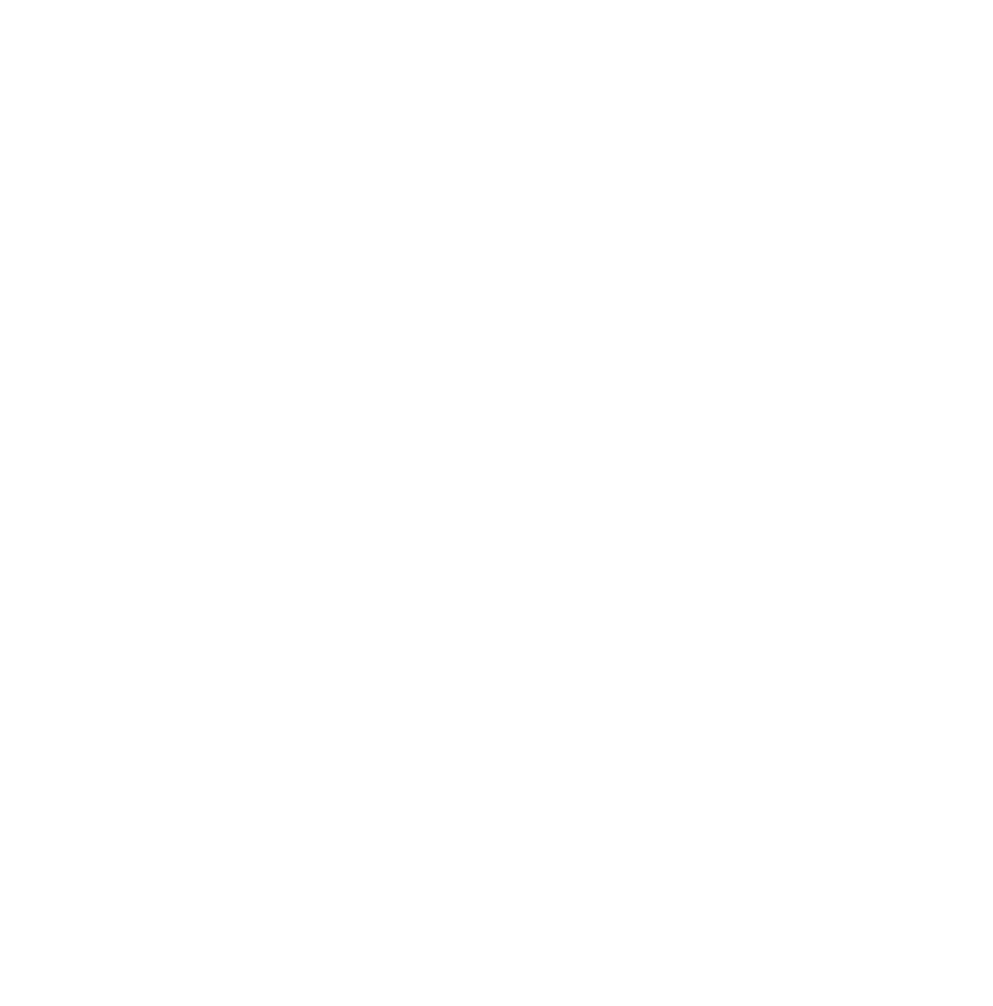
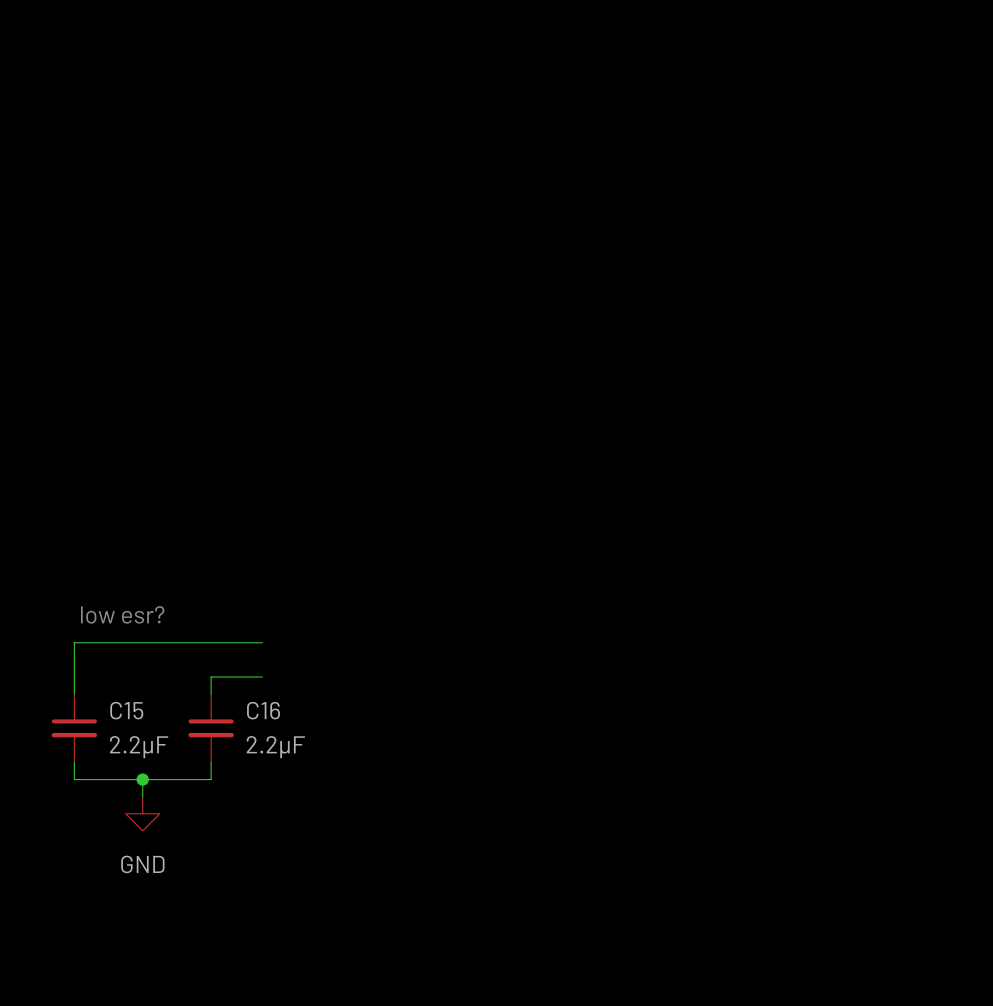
text: none -> low esr? (122, 614)
wire: none -> (262, 642) (74, 642) (74, 694)
wire: none -> (262, 677) (211, 677) (211, 694)
C15: none -> 2.2μF (74, 728)
C16: none -> 2.2μF (211, 728)
wire: none -> (74, 762) (74, 779) (211, 779) (211, 762)
wire: none -> (142, 779) (142, 796)
junction: none -> (142, 779)
power symbol: none -> GND (142, 813)

